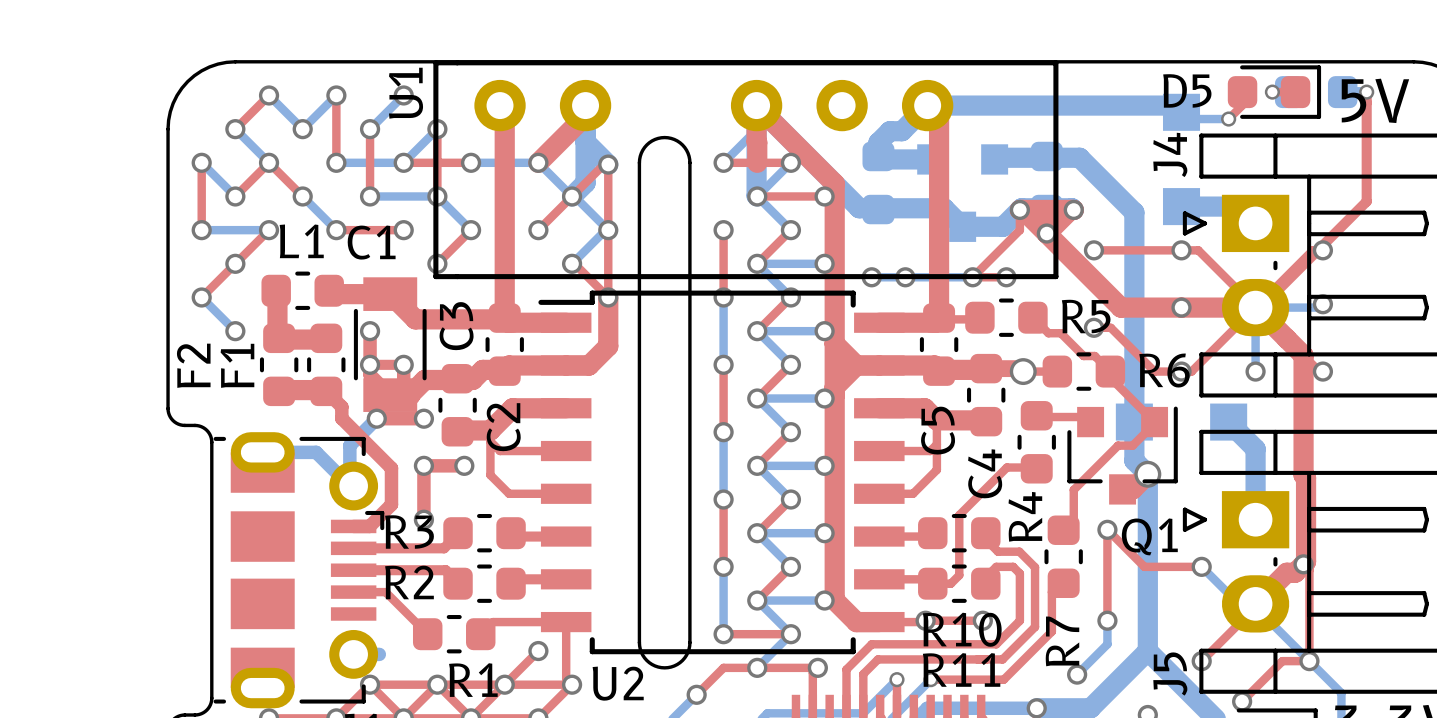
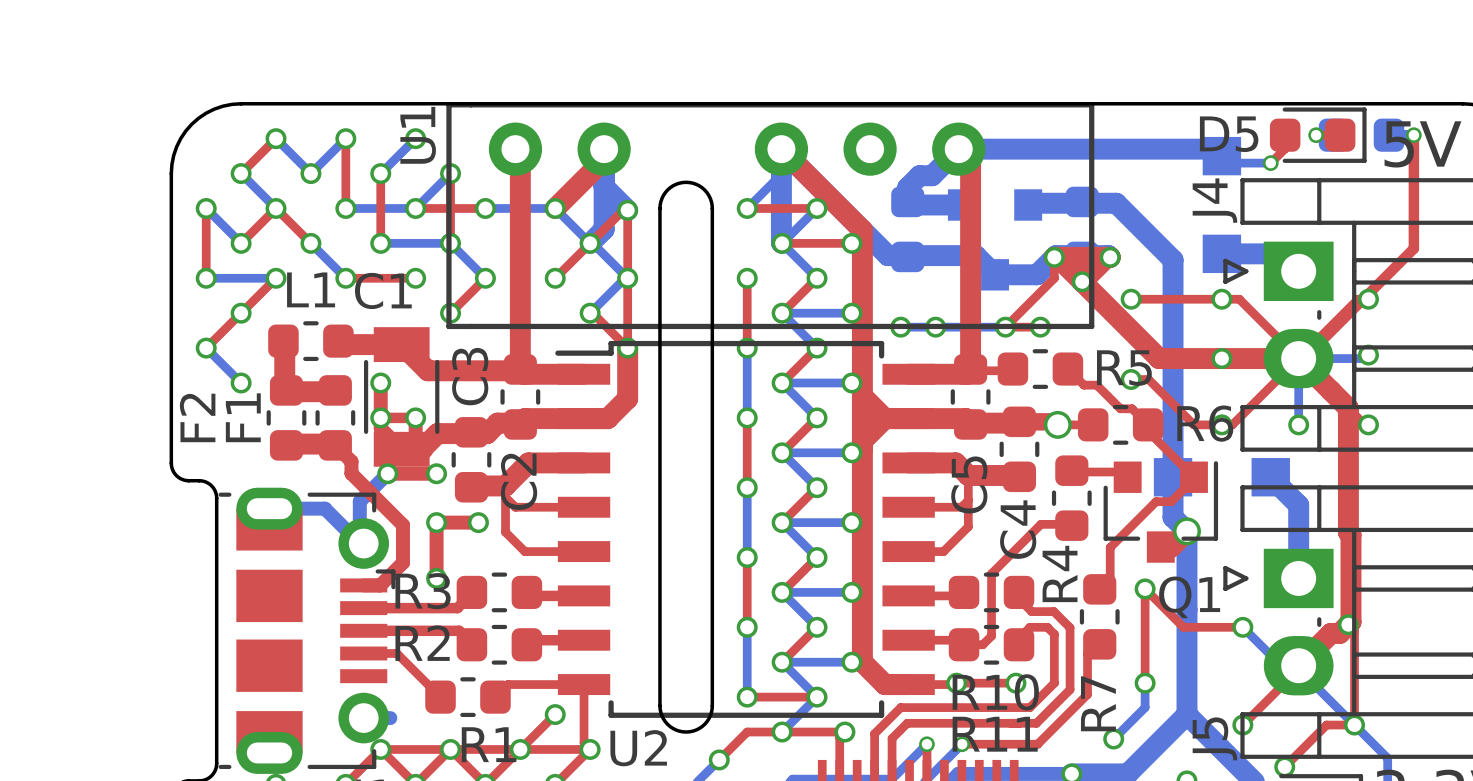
top track: (756, 105) (757, 162) -> none

